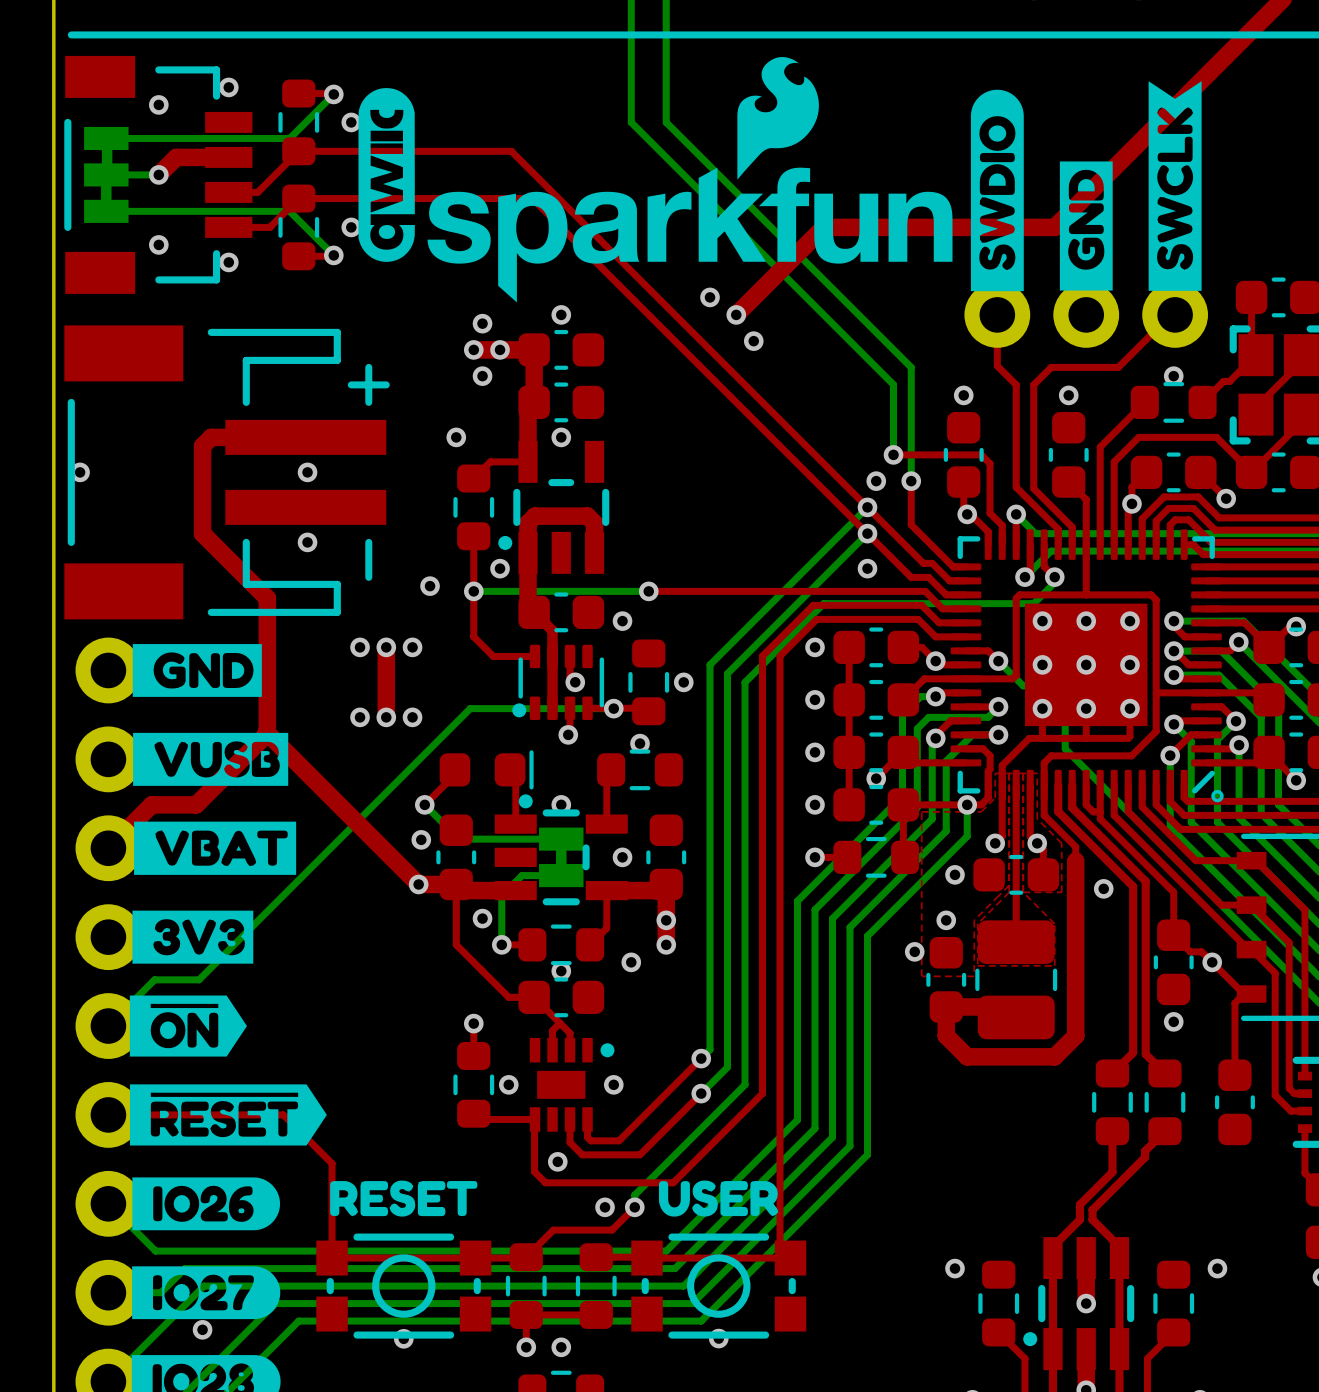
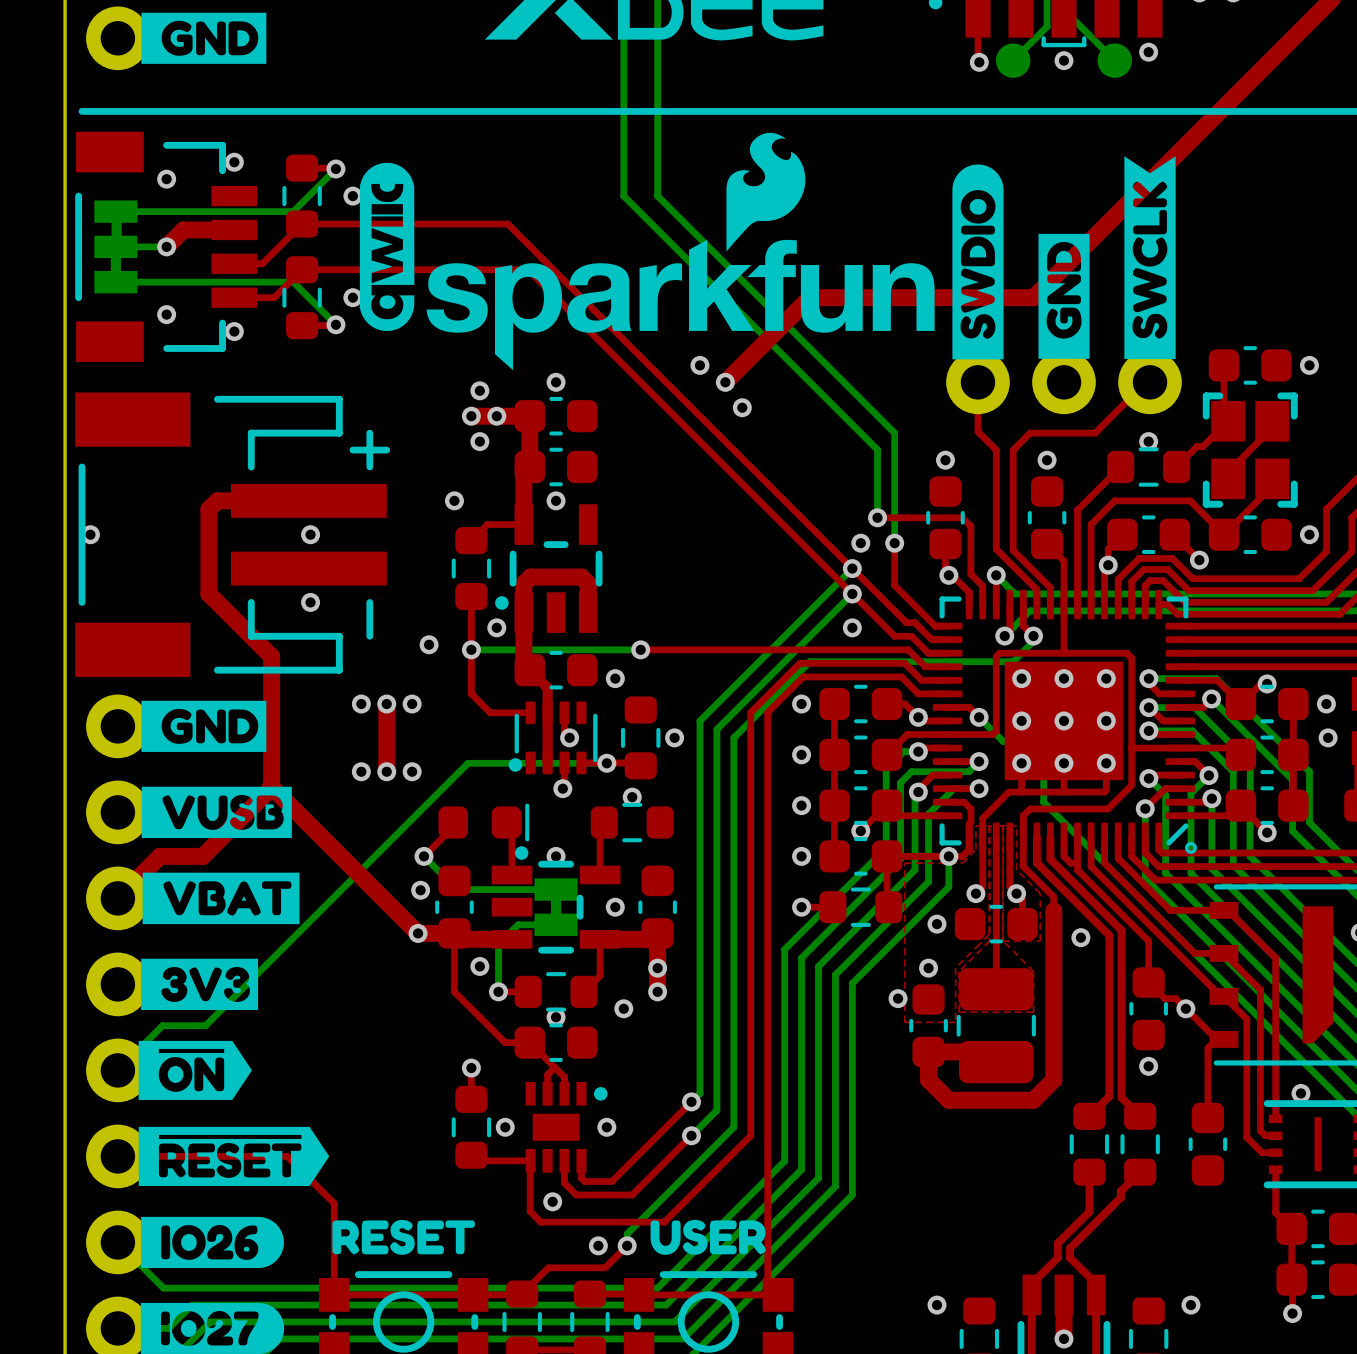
part footprint: [64, 325, 387, 620] -> [75, 392, 387, 677]

